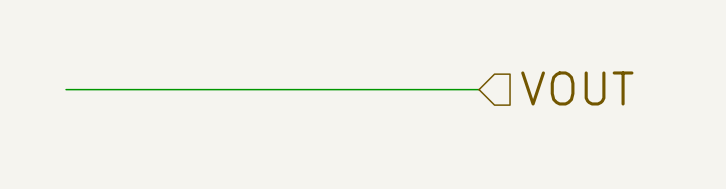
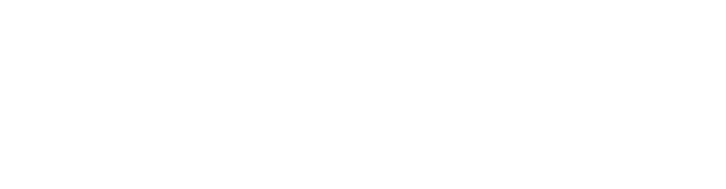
hierarchical label: VOUT (577, 88) -> none
wire: (66, 89) (479, 89) -> none

